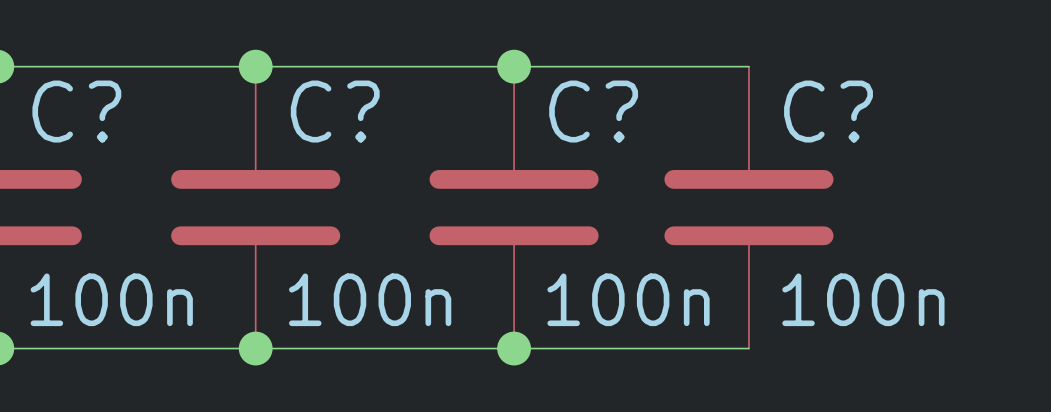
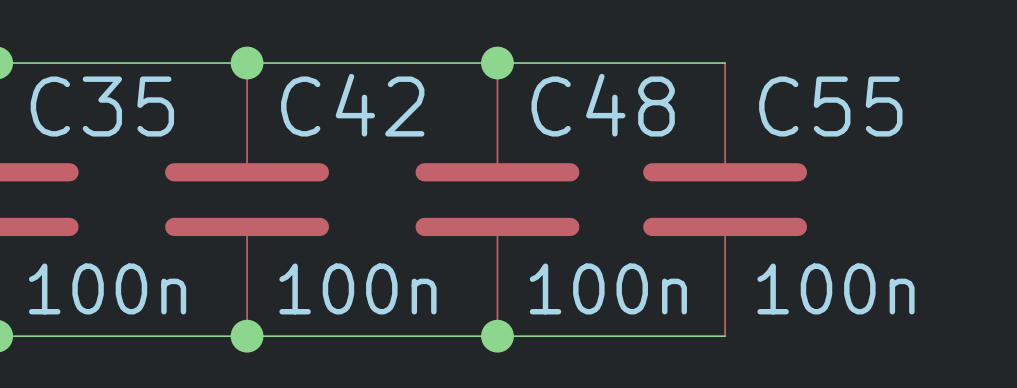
C? name: C? (76, 111) -> C35 (102, 106)
C? name: C? (335, 111) -> C42 (352, 105)
C? name: C? (593, 111) -> C48 (603, 105)
C? name: C? (828, 111) -> C55 (830, 106)

